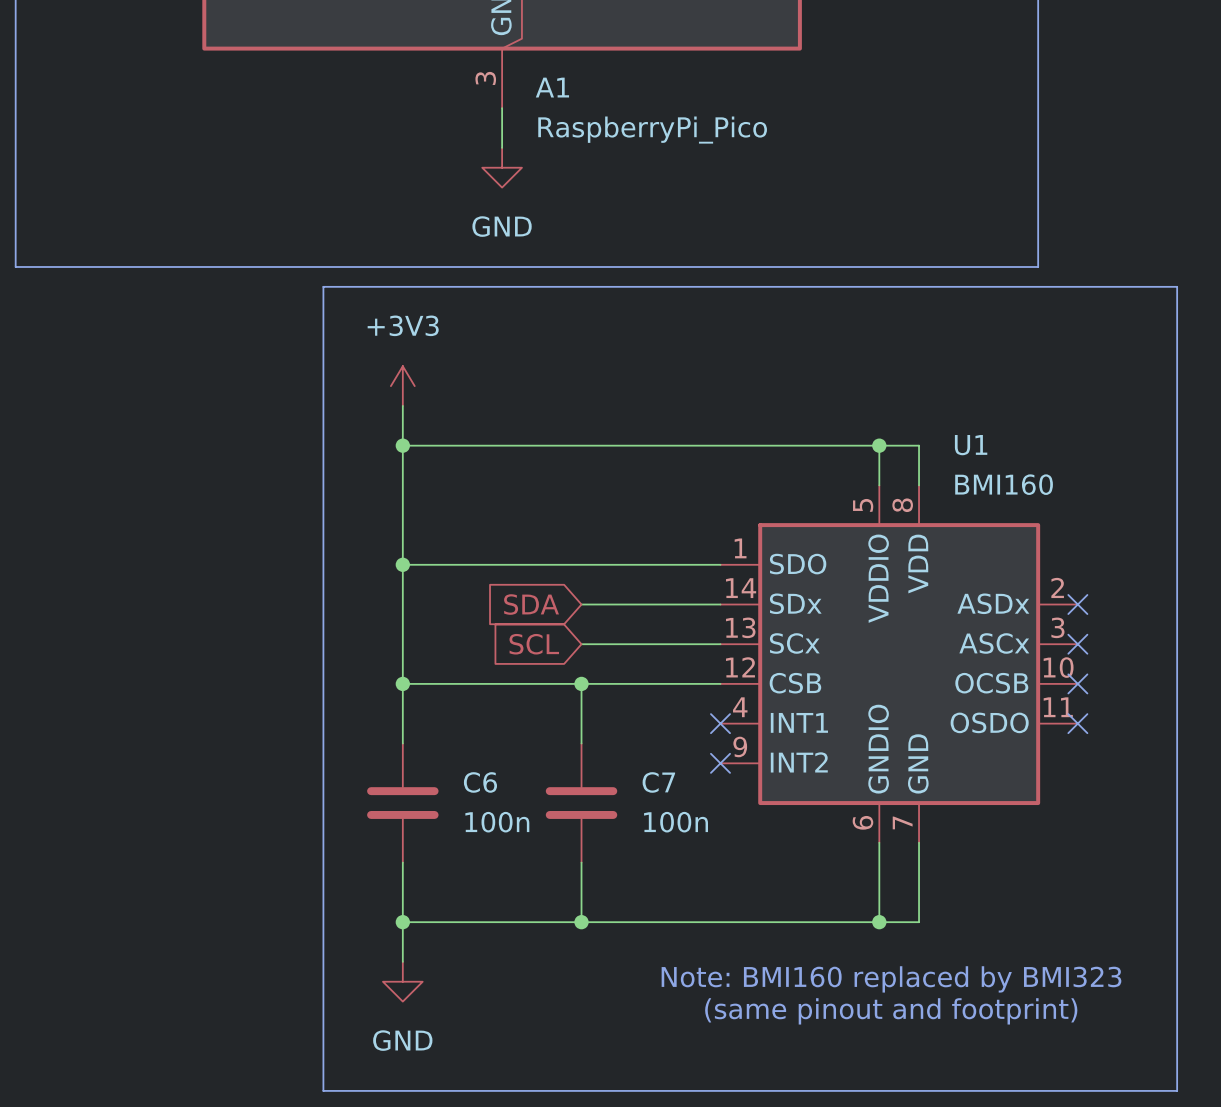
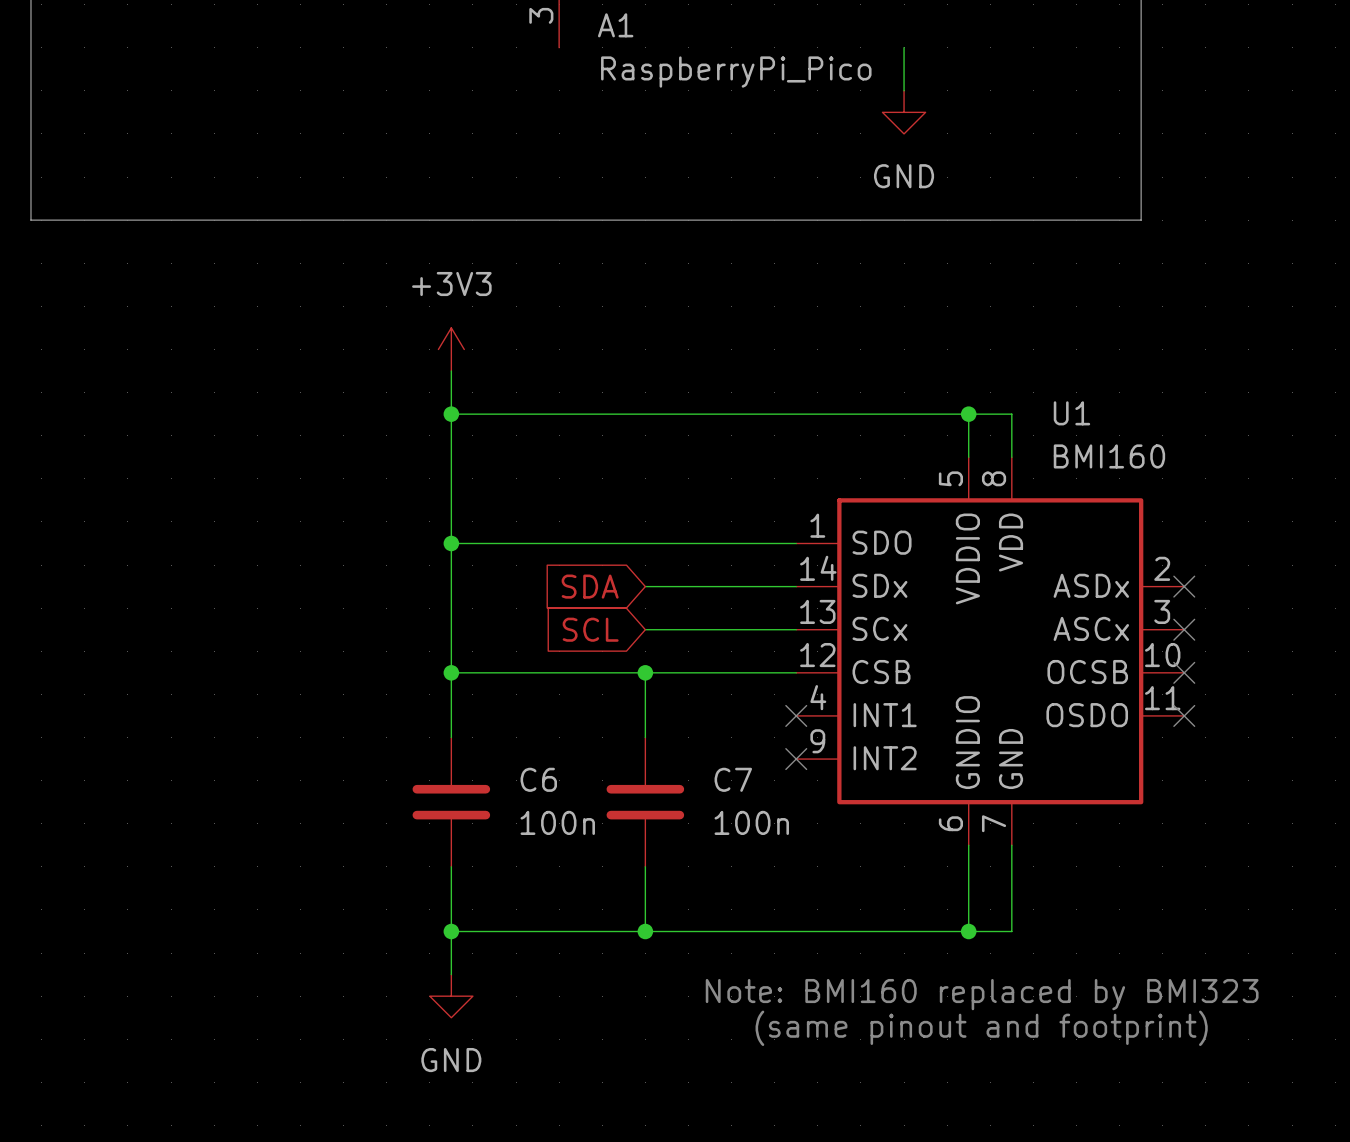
wire: (502, 108) (502, 147) -> (904, 47) (904, 90)
power symbol: GND (502, 167) -> none
power symbol: none -> GND (904, 112)
line: (323, 286) (1177, 286) (1177, 1090) (323, 1090) (323, 286) -> none

